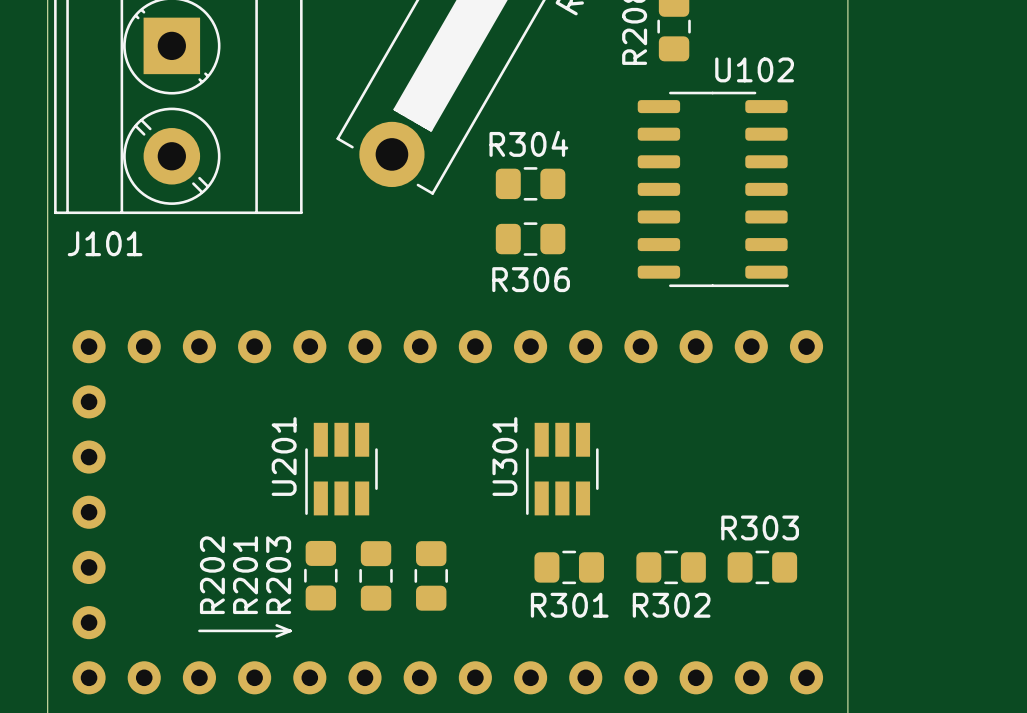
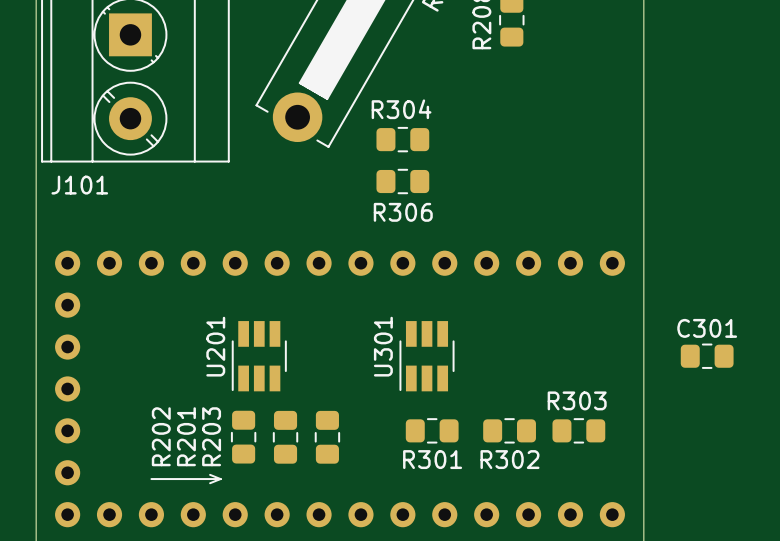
U102: (713, 189) -> none
C301: none -> (707, 356)

